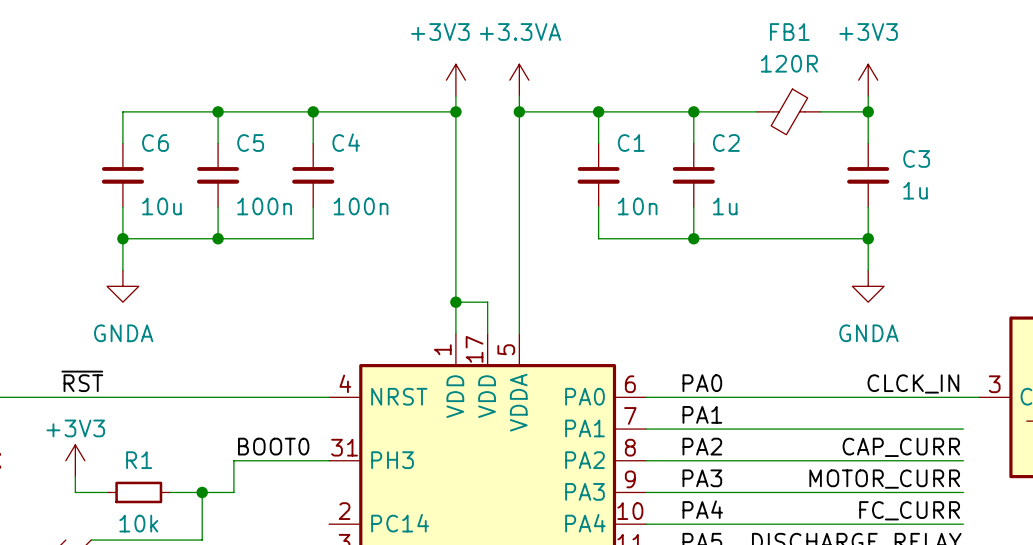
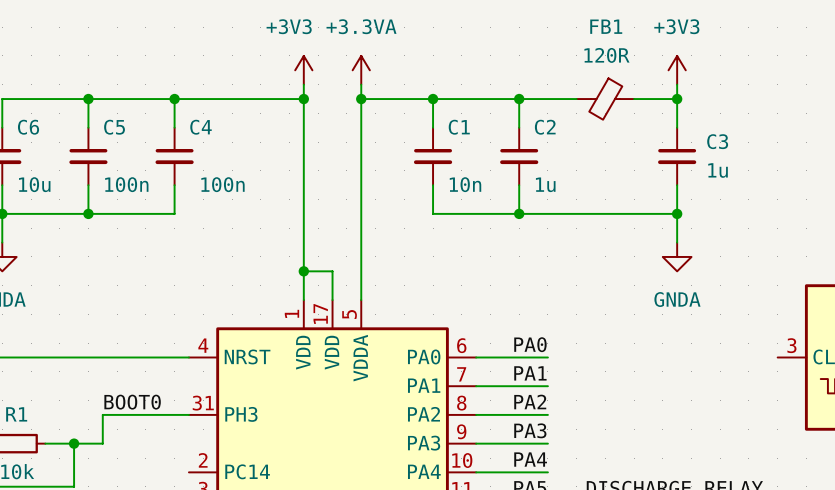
label: CLCK_IN (913, 383) -> none
wire: (725, 397) (979, 397) -> none
wire: (725, 429) (963, 429) -> none
label: CAP_CURR (901, 447) -> none
wire: (725, 460) (963, 460) -> none
label: MOTOR_CURR (884, 479) -> none
wire: (725, 492) (963, 492) -> none
label: FC_CURR (909, 510) -> none
wire: (725, 524) (963, 524) -> none

